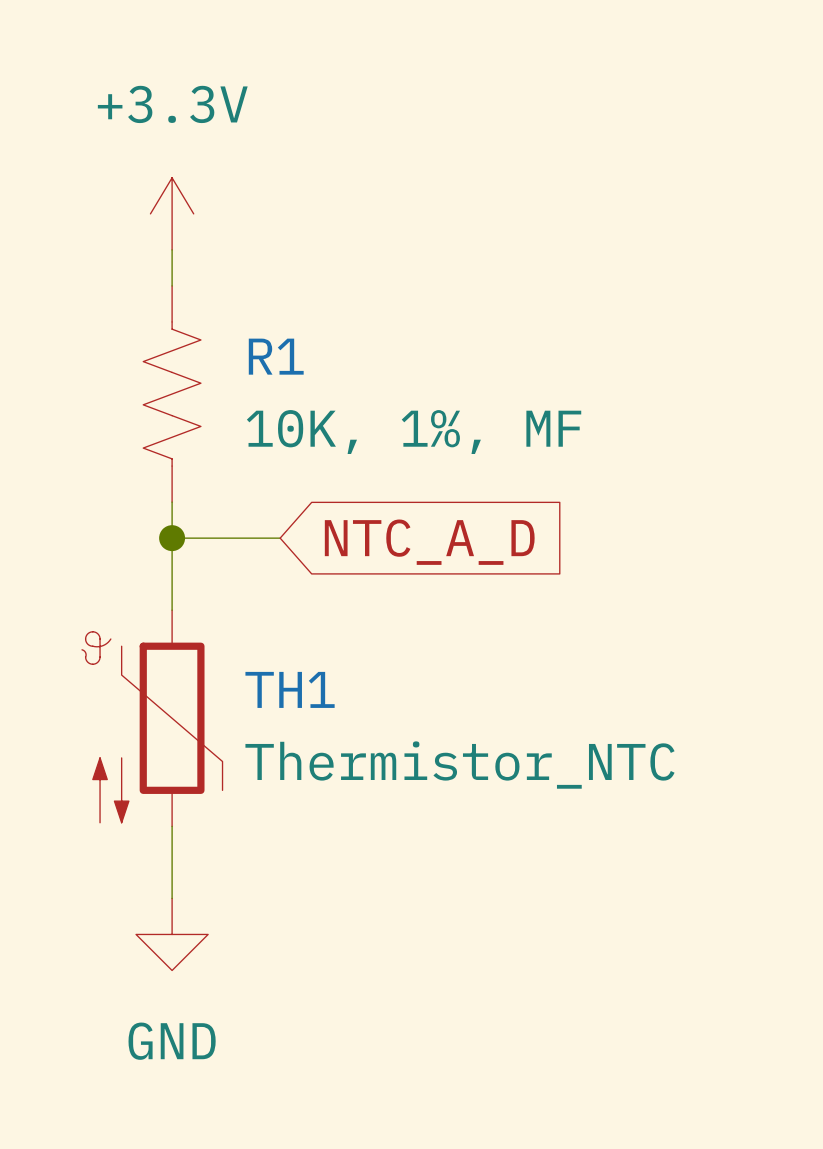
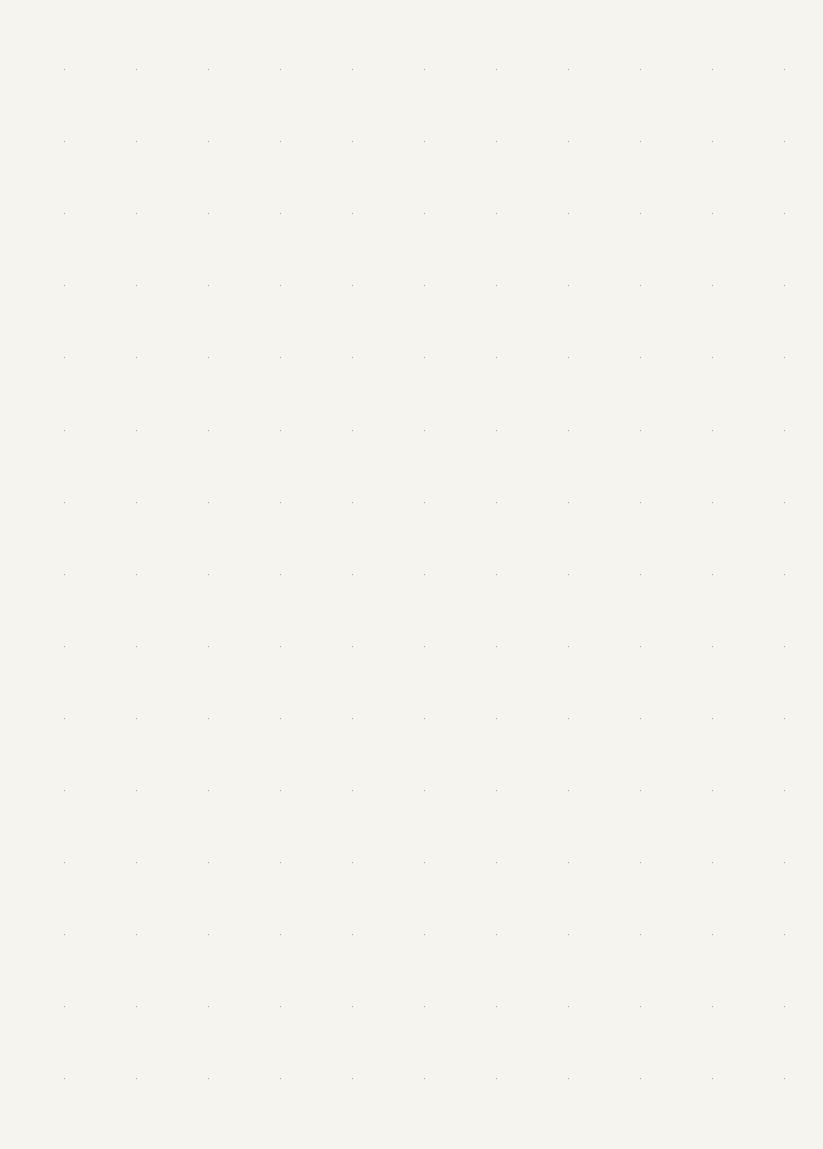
power symbol: +3.3V (172, 213) -> none
wire: (172, 249) (172, 285) -> none
R1: 10K, 1%, MF (172, 394) -> none
wire: (172, 502) (172, 610) -> none
wire: (172, 538) (280, 538) -> none
junction: (172, 538) -> none
global label: NTC_A_D (429, 542) -> none
TH1: Thermistor_NTC (152, 718) -> none
wire: (172, 826) (172, 898) -> none
power symbol: GND (172, 934) -> none

